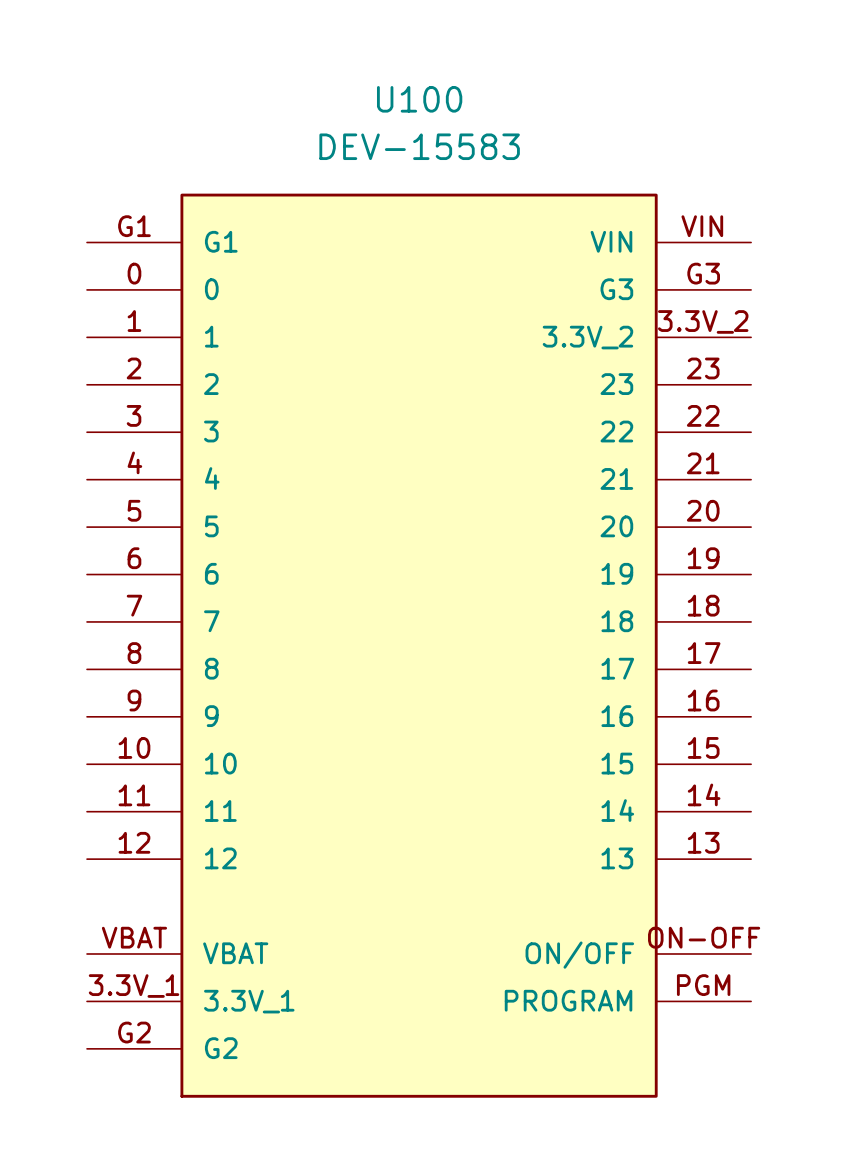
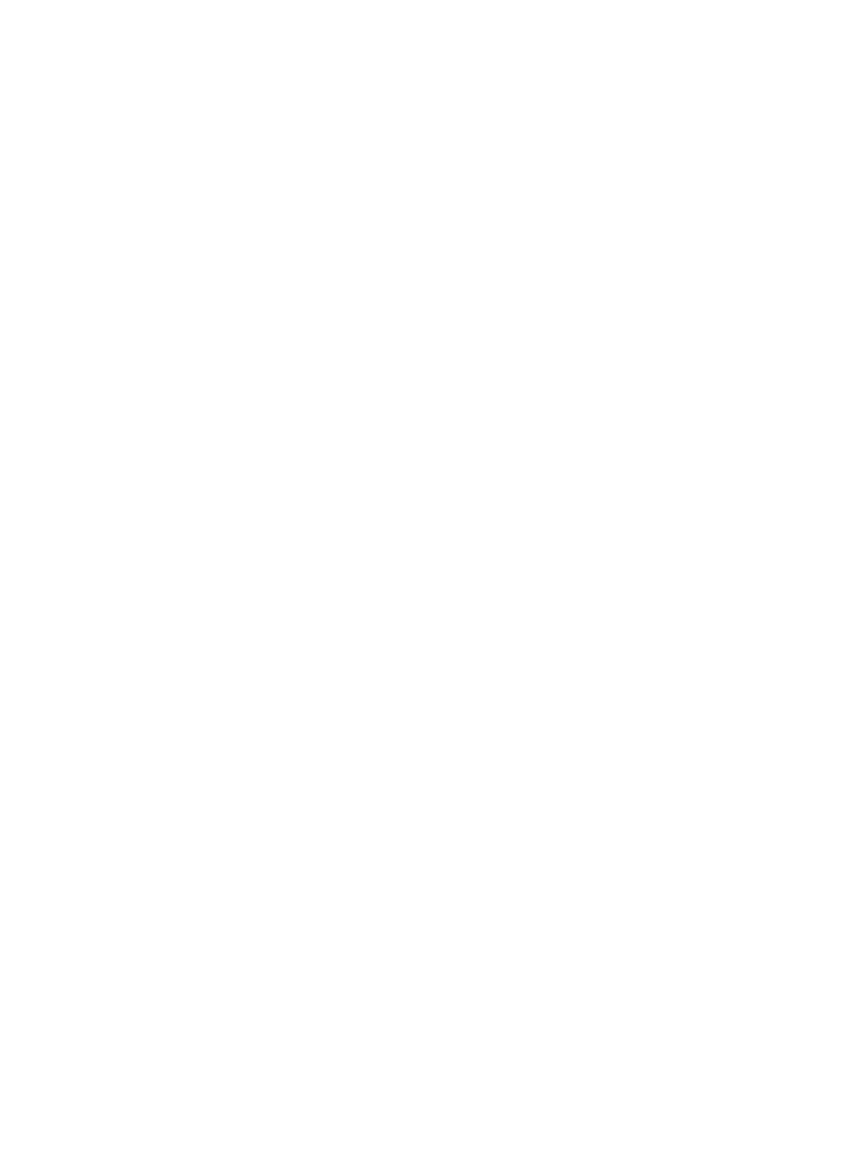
U100: DEV-15583 (419, 645) -> none

